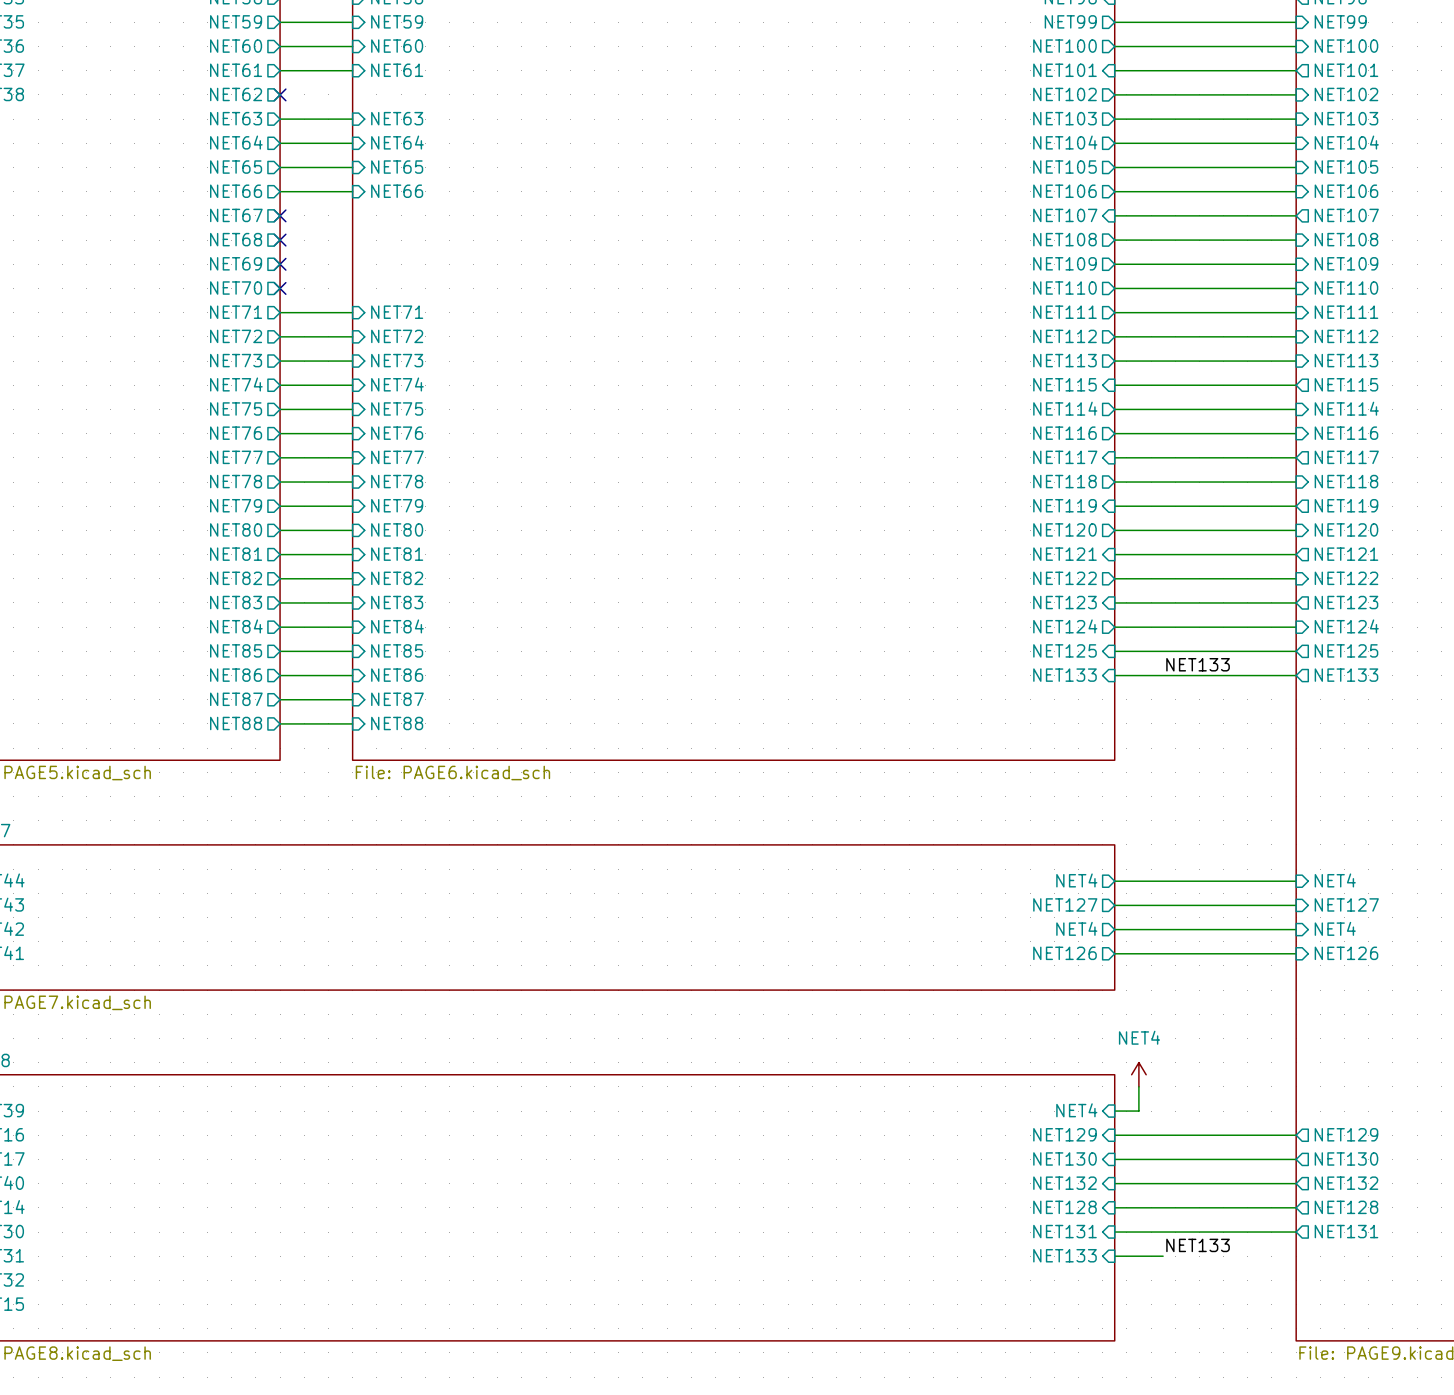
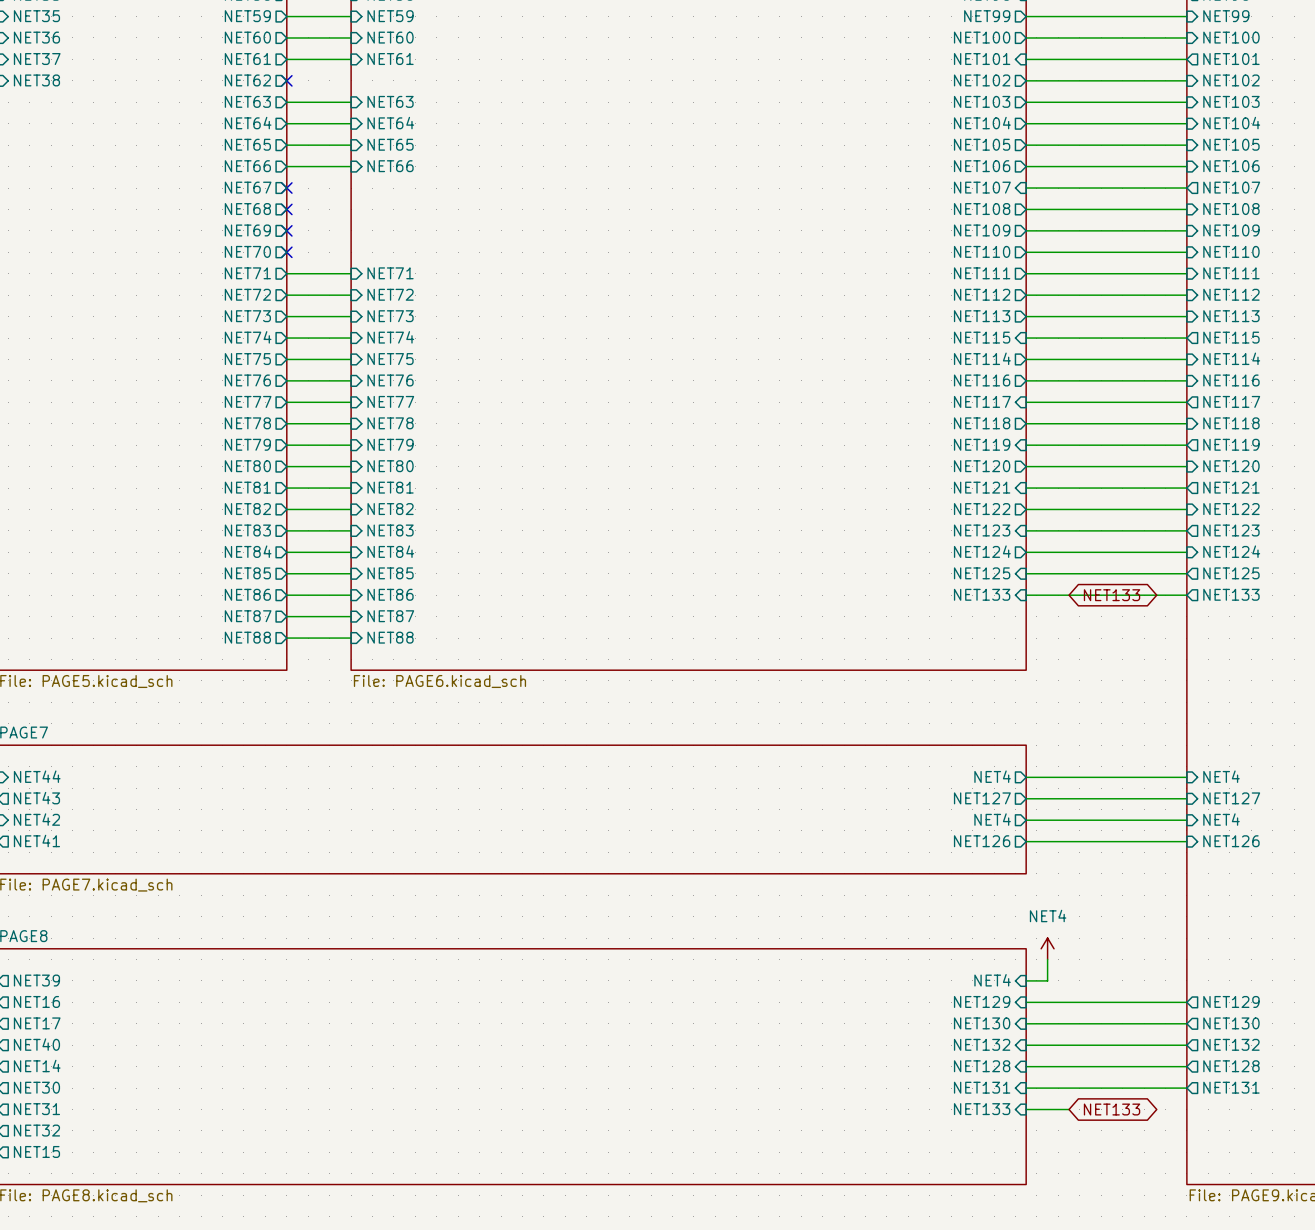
label: NET133 (1198, 664) -> none
global label: none -> NET133 (1112, 595)
label: NET133 (1198, 1245) -> none
global label: none -> NET133 (1112, 1109)

